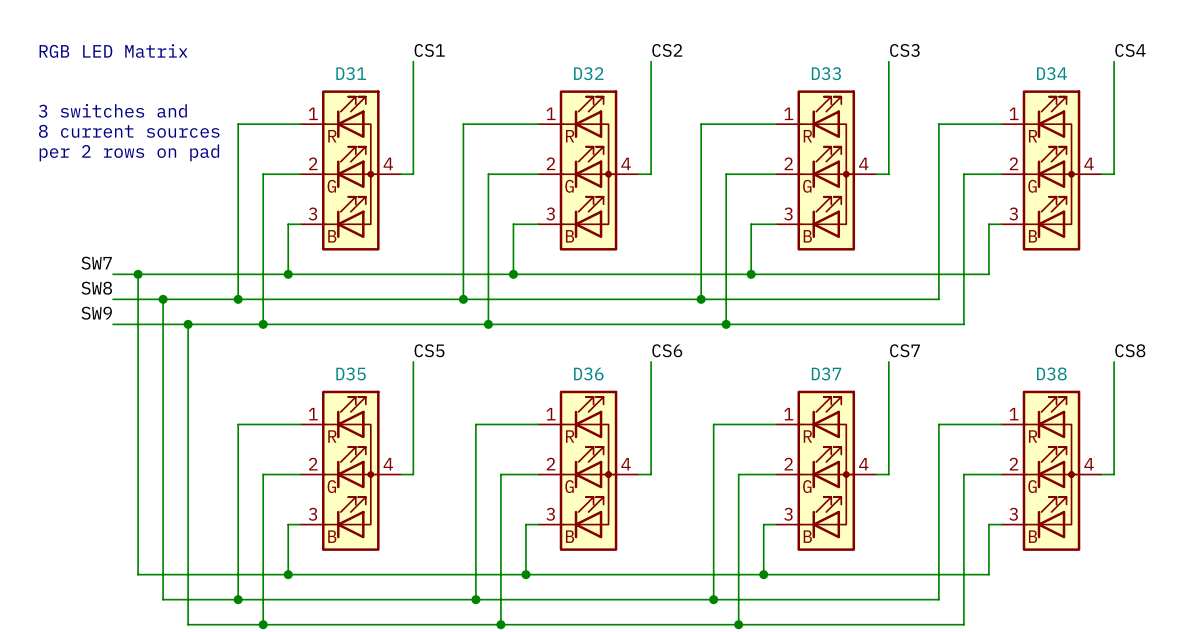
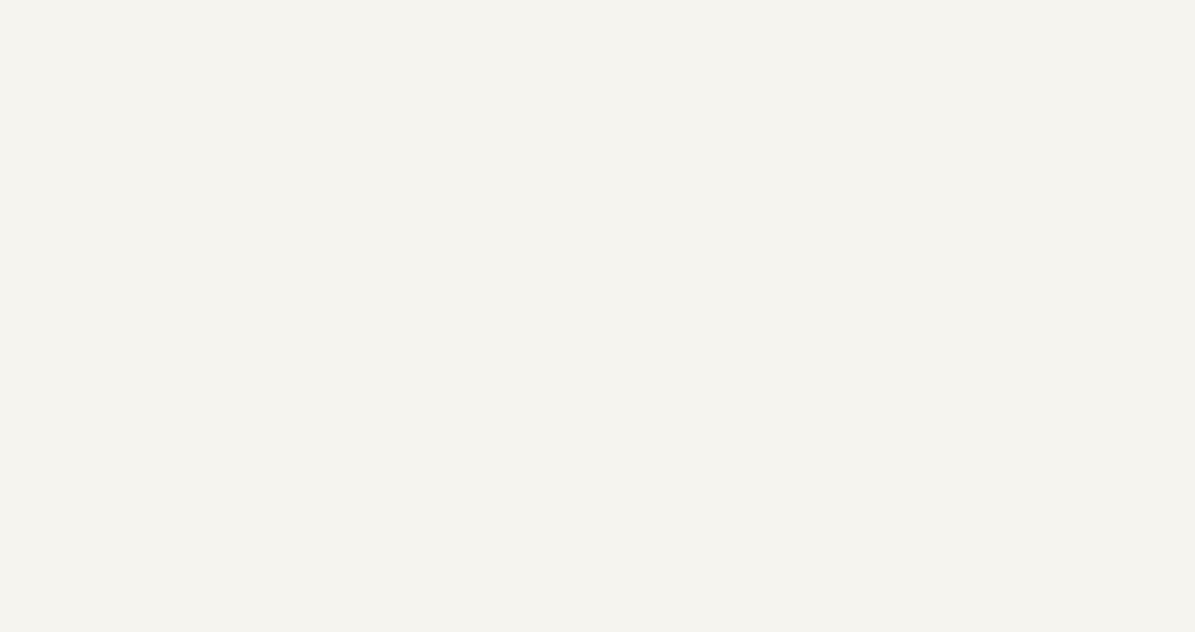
label: CS1 (429, 50) -> none
label: CS2 (667, 50) -> none
label: CS3 (904, 50) -> none
label: CS4 (1130, 50) -> none
text: RGB LED Matrix (113, 51) -> none
wire: (413, 61) (413, 174) (400, 174) -> none
wire: (651, 61) (651, 174) (638, 174) -> none
wire: (888, 61) (888, 174) (876, 174) -> none
wire: (1114, 61) (1114, 174) (1101, 174) -> none
text: 3 switches and (112, 110) -> none
wire: (300, 124) (238, 124) (238, 299) -> none
wire: (538, 124) (463, 124) (463, 299) -> none
wire: (776, 124) (701, 124) (701, 299) -> none
wire: (1001, 124) (938, 124) (938, 299) (113, 299) -> none
text: 8 current sources (129, 131) -> none
text: per 2 rows on pad (129, 152) -> none
D31: (350, 170) -> none
D32: (588, 170) -> none
D33: (826, 170) -> none
D34: (1051, 170) -> none
wire: (300, 174) (263, 174) (263, 324) -> none
wire: (538, 174) (488, 174) (488, 324) -> none
wire: (776, 174) (726, 174) (726, 324) -> none
wire: (1001, 174) (963, 174) (963, 324) (113, 324) -> none
wire: (300, 224) (288, 224) (288, 274) -> none
wire: (538, 224) (513, 224) (513, 274) -> none
wire: (776, 224) (751, 224) (751, 274) -> none
wire: (1001, 224) (988, 224) (988, 274) (113, 274) -> none
label: SW7 (96, 263) -> none
wire: (138, 274) (138, 574) (988, 574) (988, 524) (1001, 524) -> none
junction: (138, 274) -> none
junction: (288, 274) -> none
junction: (513, 274) -> none
junction: (751, 274) -> none
label: SW8 (96, 288) -> none
wire: (163, 299) (163, 599) (938, 599) (938, 424) (1001, 424) -> none
junction: (163, 299) -> none
junction: (238, 299) -> none
junction: (463, 299) -> none
junction: (701, 299) -> none
label: SW9 (96, 313) -> none
wire: (188, 324) (188, 624) (963, 624) (963, 474) (1001, 474) -> none
junction: (188, 324) -> none
junction: (263, 324) -> none
junction: (488, 324) -> none
junction: (726, 324) -> none
label: CS5 (429, 350) -> none
label: CS6 (667, 350) -> none
label: CS7 (904, 350) -> none
label: CS8 (1130, 350) -> none
wire: (413, 361) (413, 474) (400, 474) -> none
wire: (651, 361) (651, 474) (638, 474) -> none
wire: (888, 361) (888, 474) (876, 474) -> none
wire: (1114, 361) (1114, 474) (1101, 474) -> none
wire: (300, 424) (238, 424) (238, 599) -> none
wire: (538, 424) (475, 424) (475, 599) -> none
wire: (776, 424) (713, 424) (713, 599) -> none
D35: (350, 470) -> none
D36: (588, 470) -> none
D37: (826, 470) -> none
D38: (1051, 470) -> none
wire: (300, 474) (263, 474) (263, 624) -> none
wire: (538, 474) (500, 474) (500, 624) -> none
wire: (776, 474) (738, 474) (738, 624) -> none
wire: (300, 524) (288, 524) (288, 574) -> none
wire: (538, 524) (525, 524) (525, 574) -> none
wire: (776, 524) (763, 524) (763, 574) -> none
junction: (288, 574) -> none
junction: (525, 574) -> none
junction: (763, 574) -> none
junction: (238, 599) -> none
junction: (475, 599) -> none
junction: (713, 599) -> none
junction: (263, 624) -> none
junction: (500, 624) -> none
junction: (738, 624) -> none

